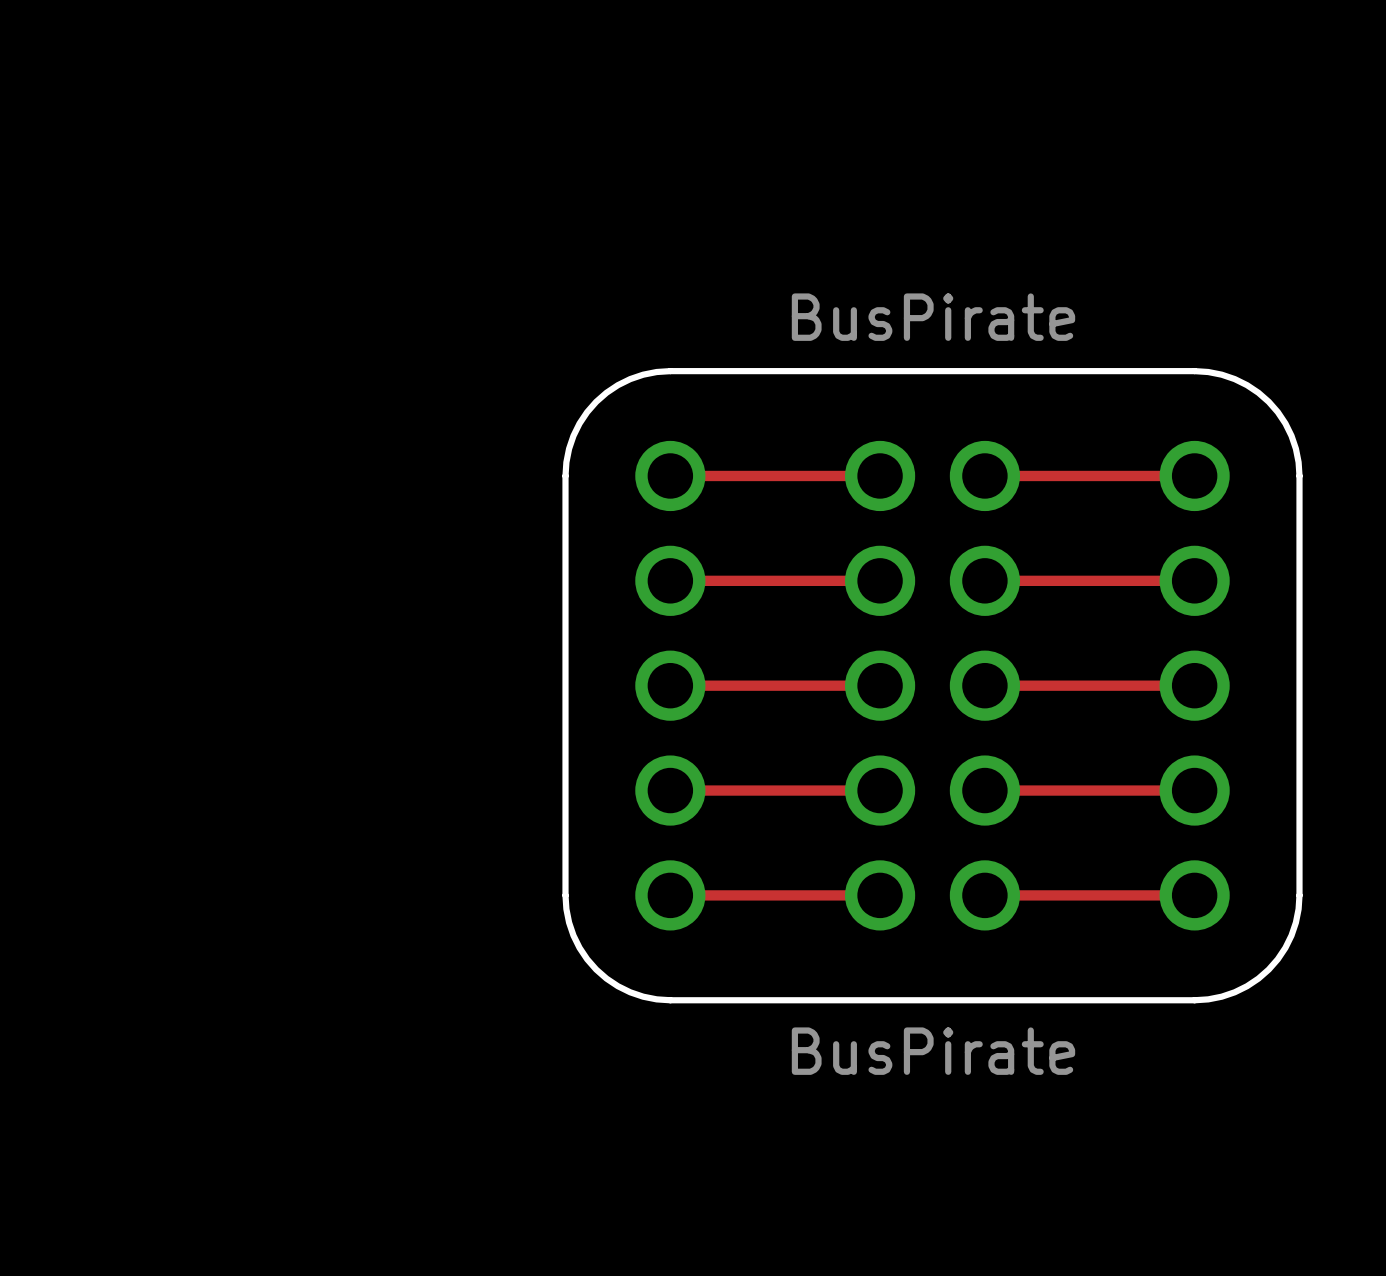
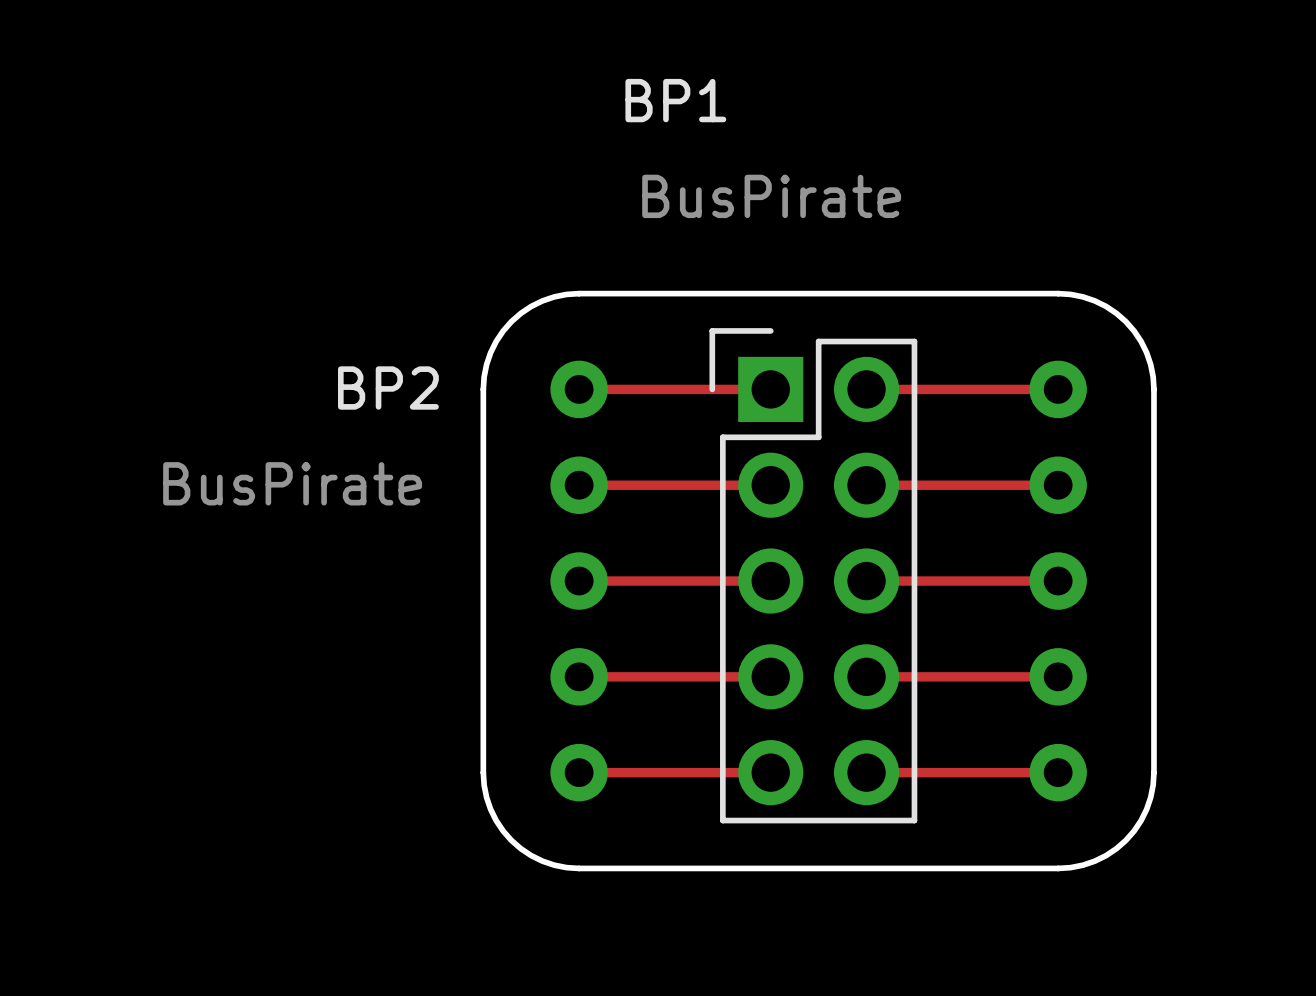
BP1: none -> BusPirate (813, 575)
part: BusPirate (932, 685) -> none
part: BusPirate (932, 685) -> none
BP2: none -> BusPirate (818, 581)

